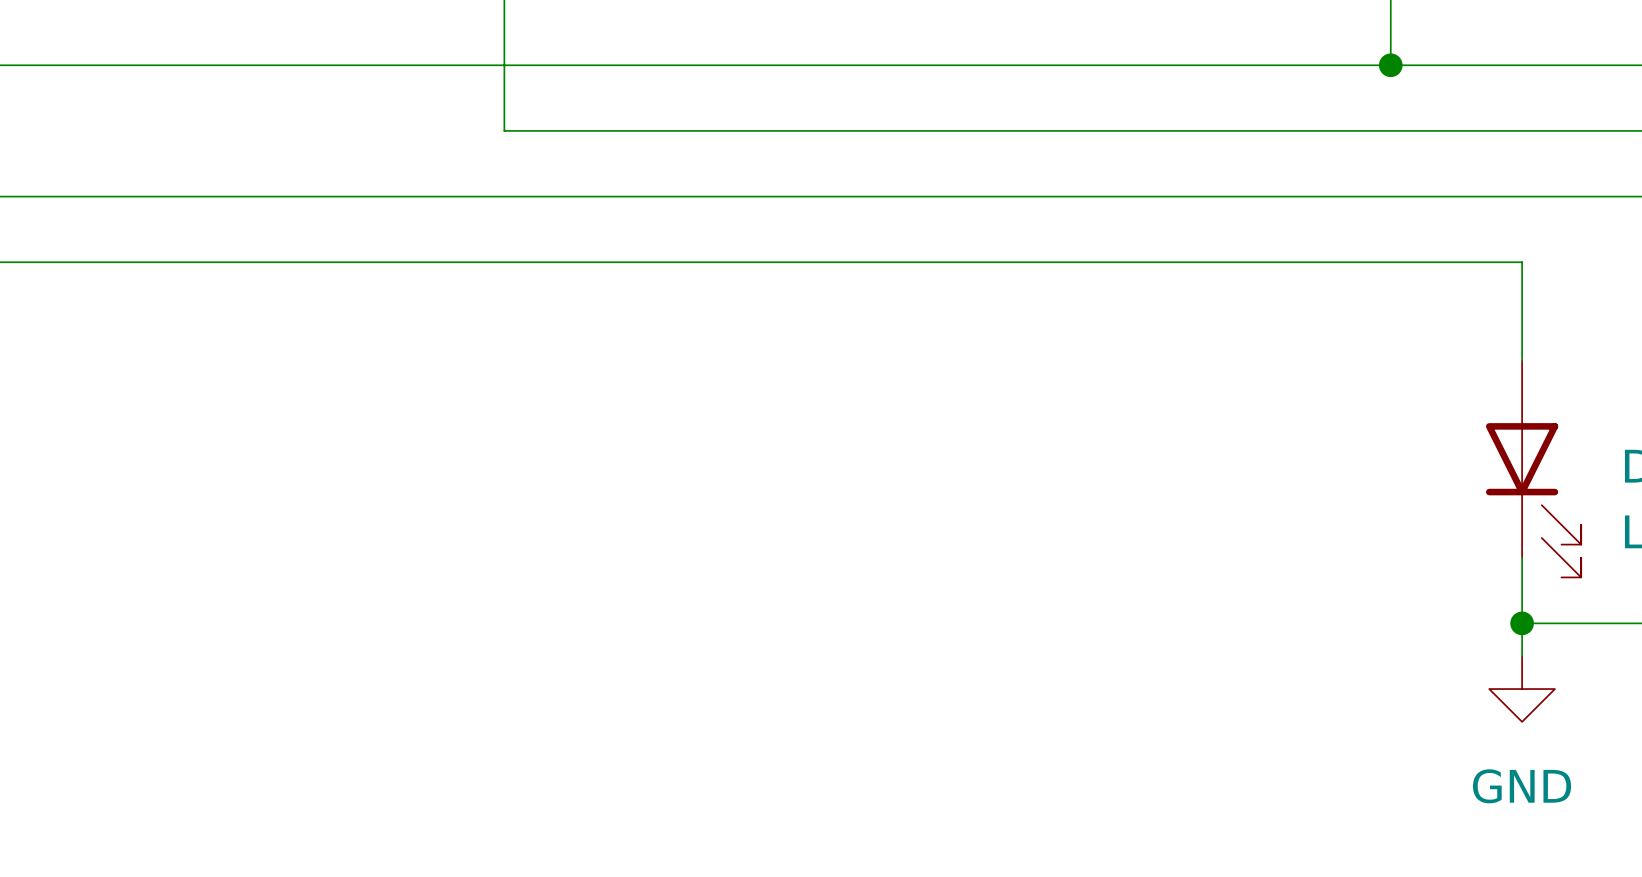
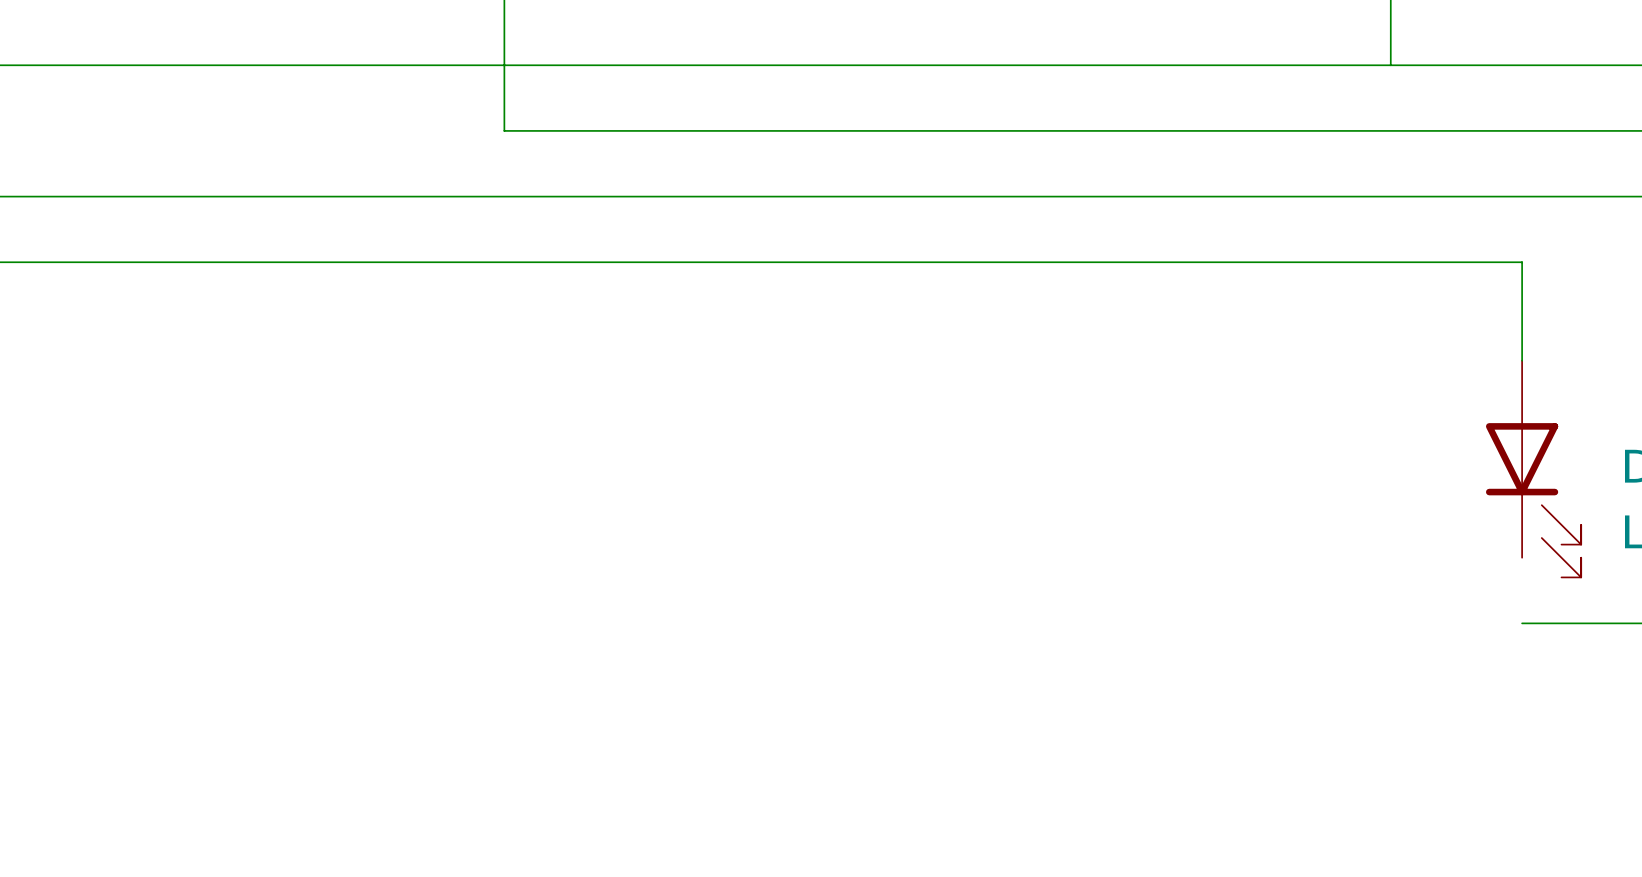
junction: (1390, 65) -> none
wire: (1522, 557) (1522, 656) -> none
junction: (1522, 623) -> none
power symbol: GND (1522, 689) -> none

